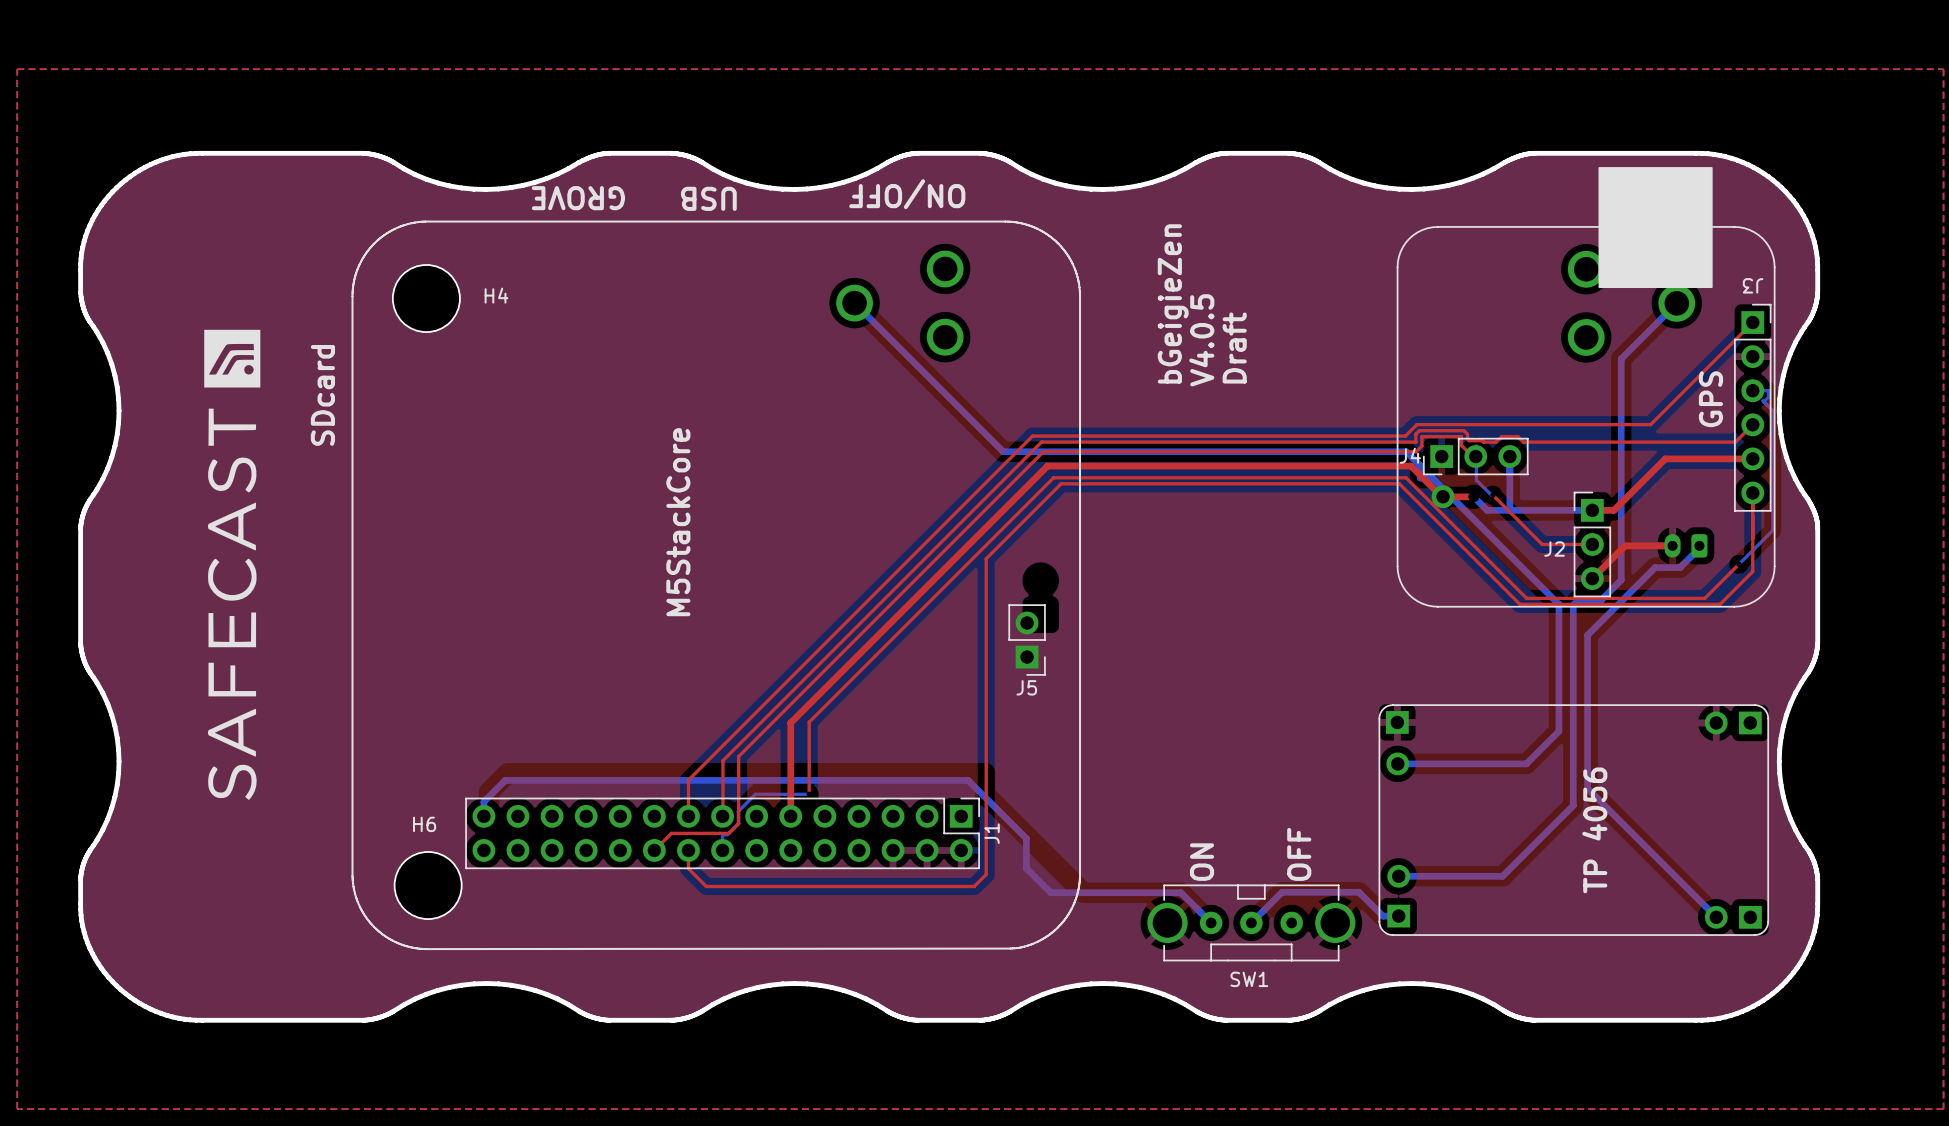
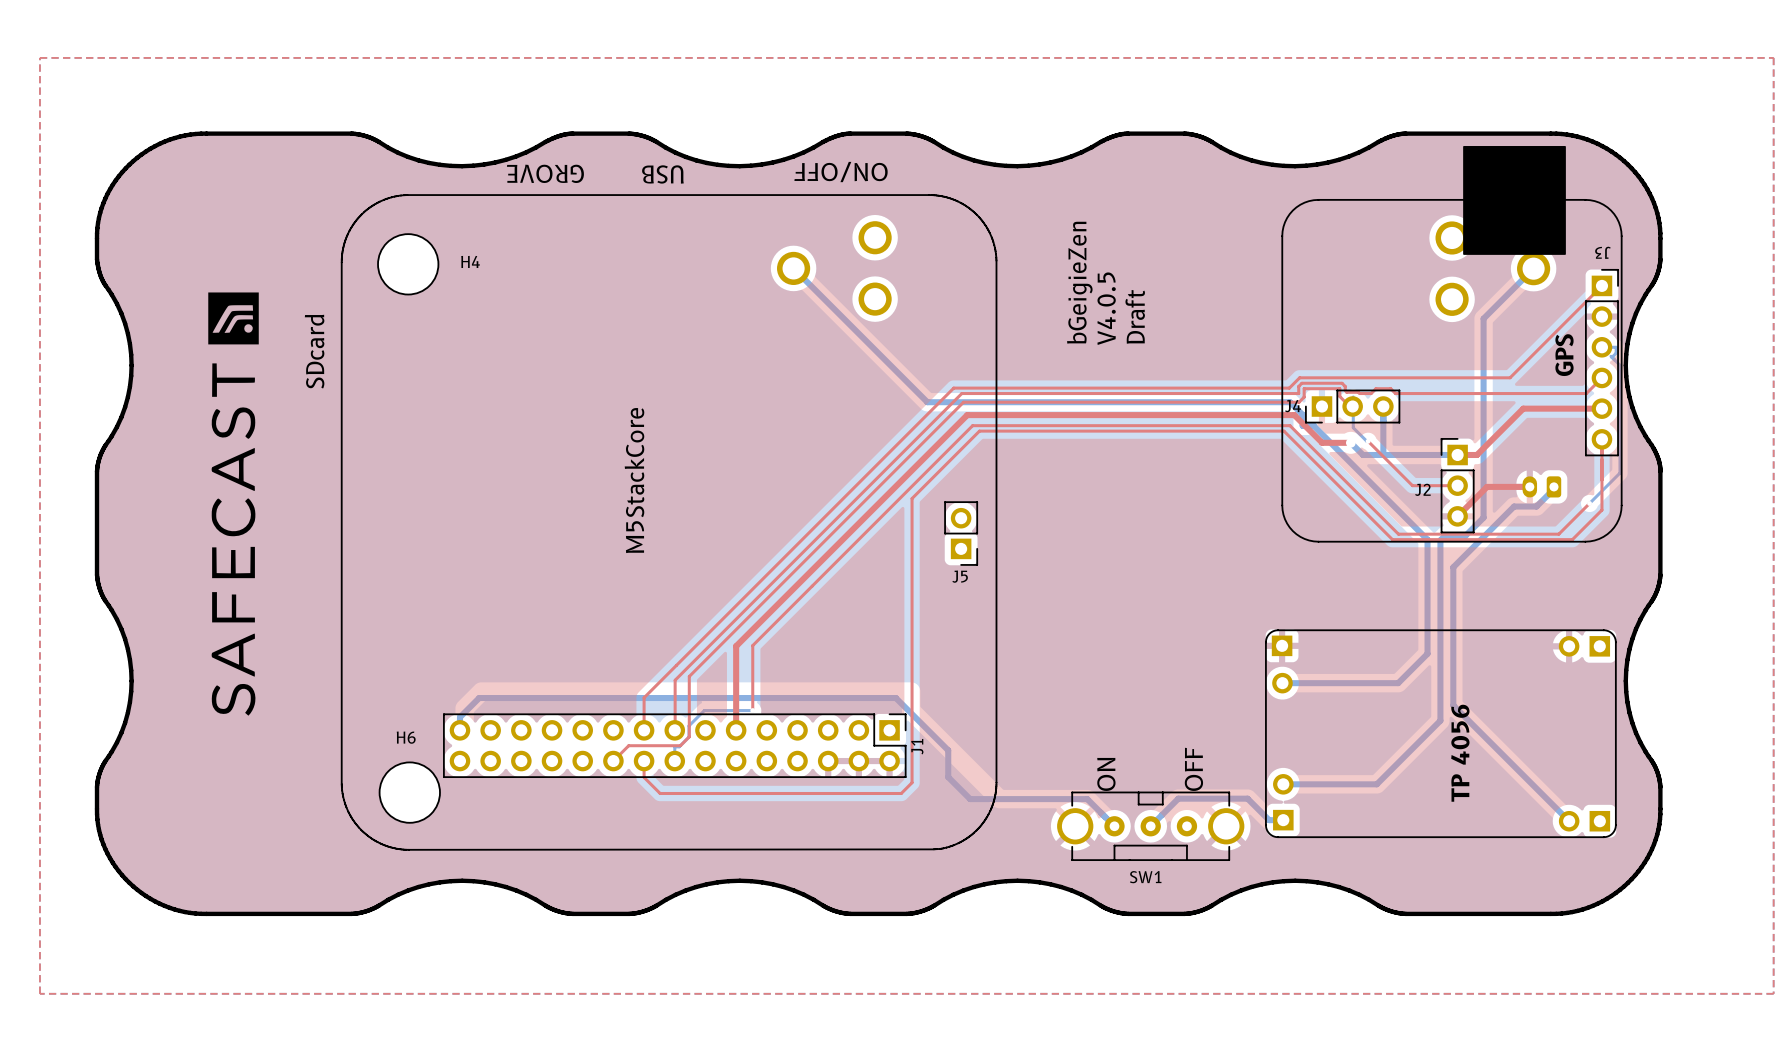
part: (1443, 496) -> none
J5 position: (1027, 640) -> (961, 533)

